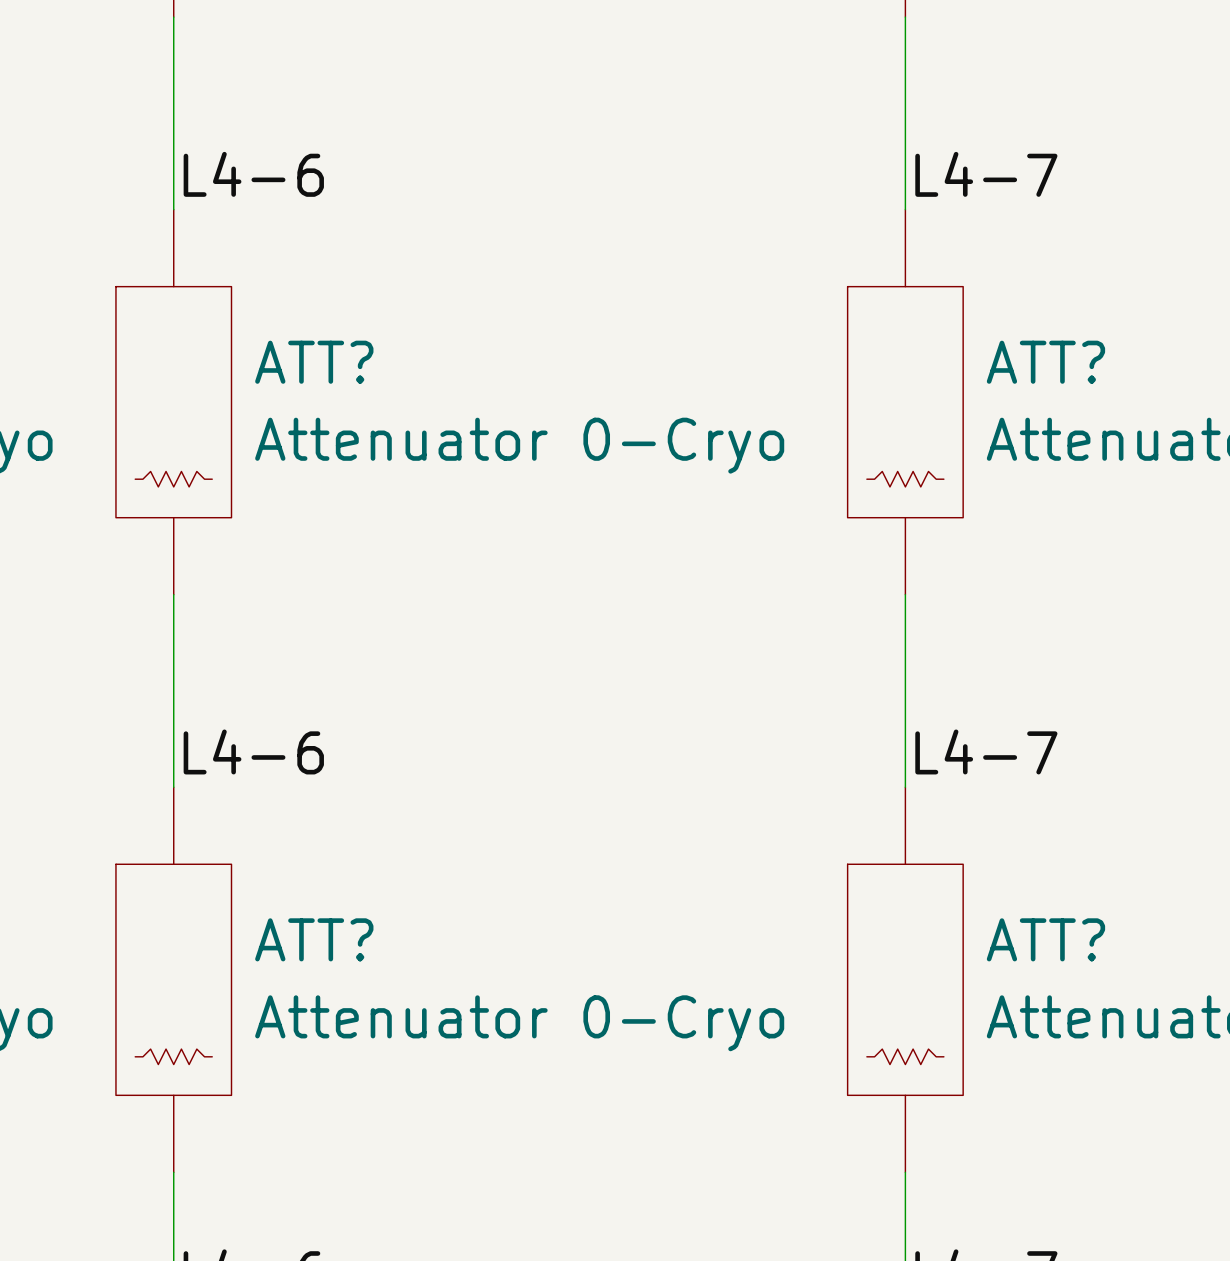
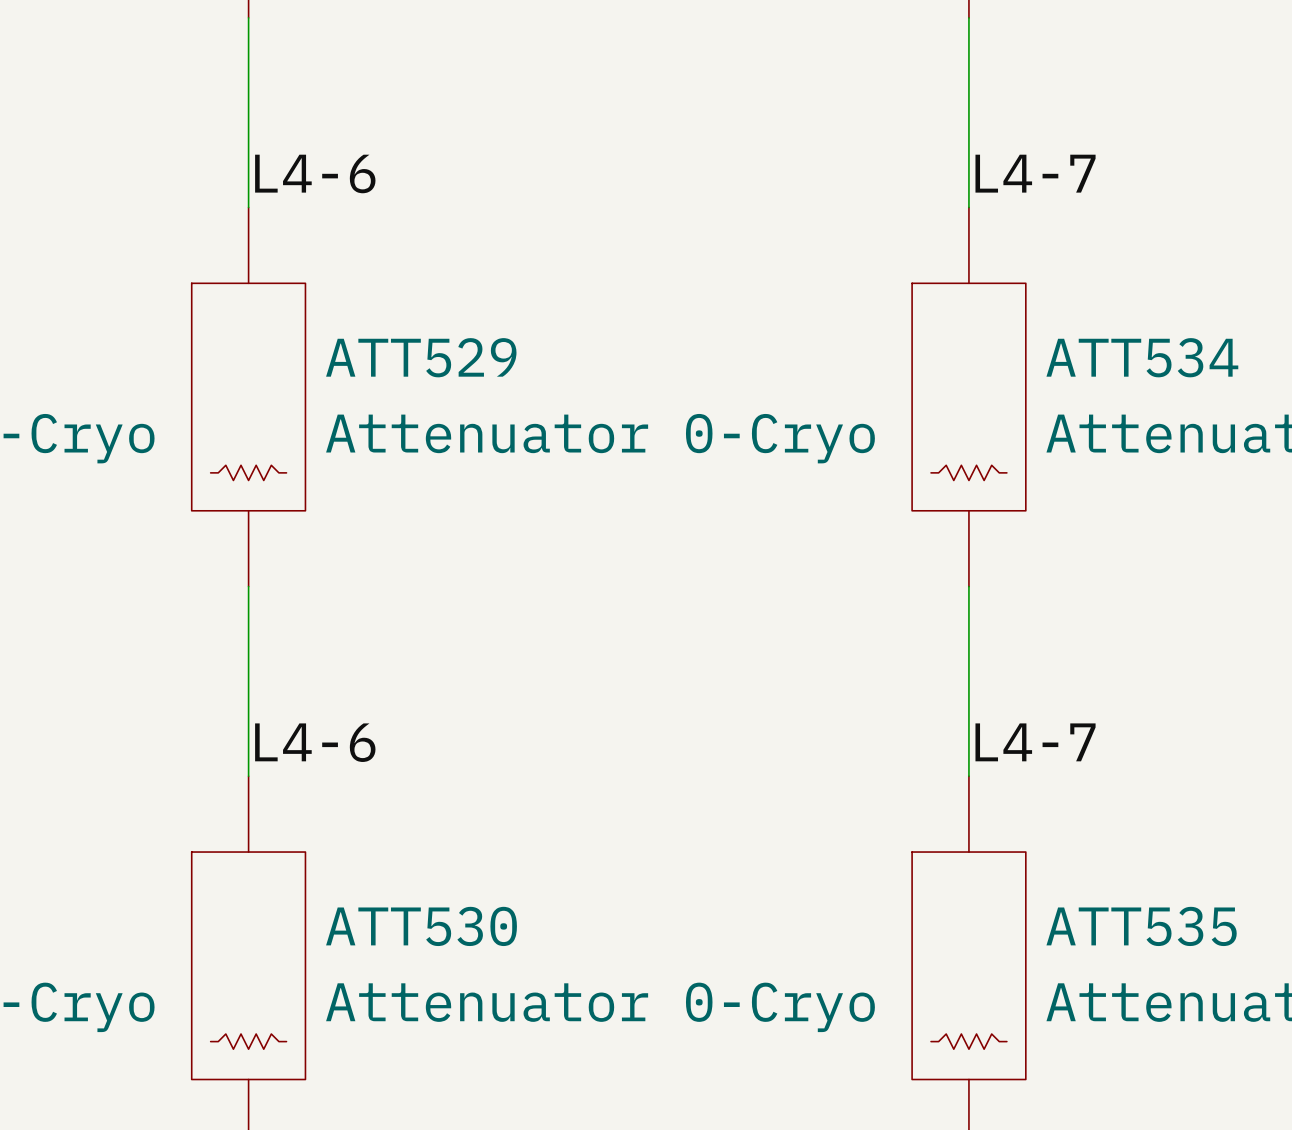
ATT? name: ATT? (314, 362) -> ATT529 (421, 357)
ATT? name: ATT? (1045, 362) -> ATT534 (1142, 357)
ATT? name: ATT? (314, 939) -> ATT530 (421, 926)
ATT? name: ATT? (1045, 939) -> ATT535 (1141, 926)

